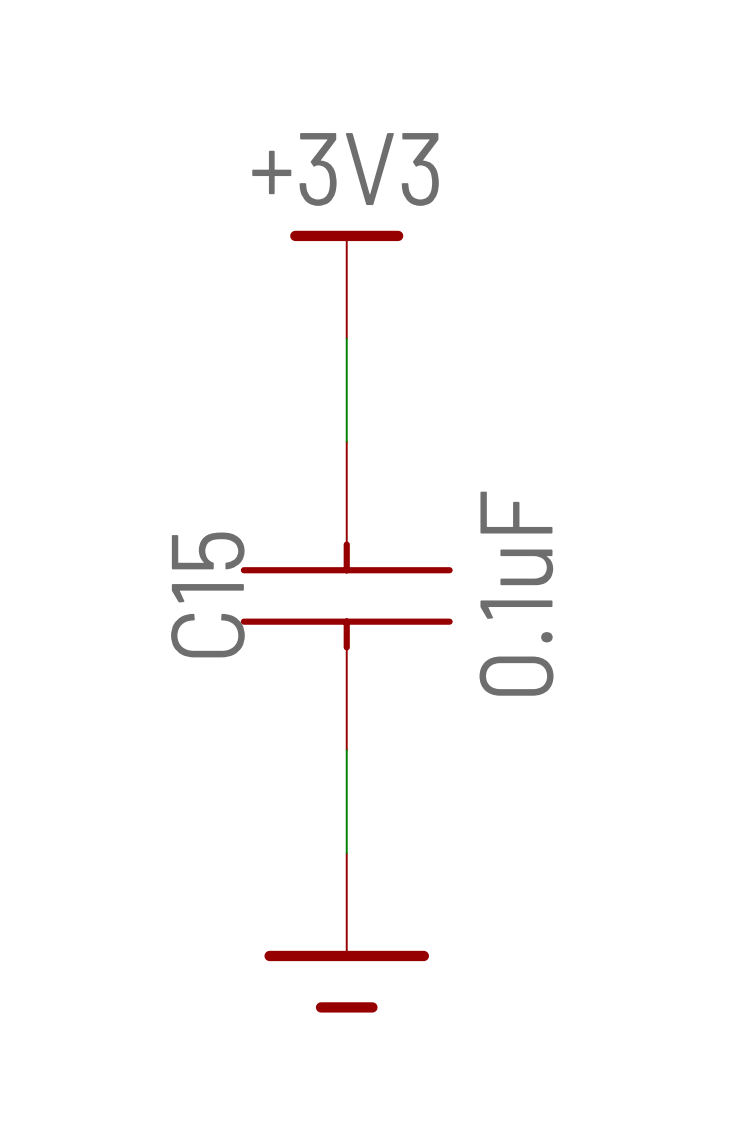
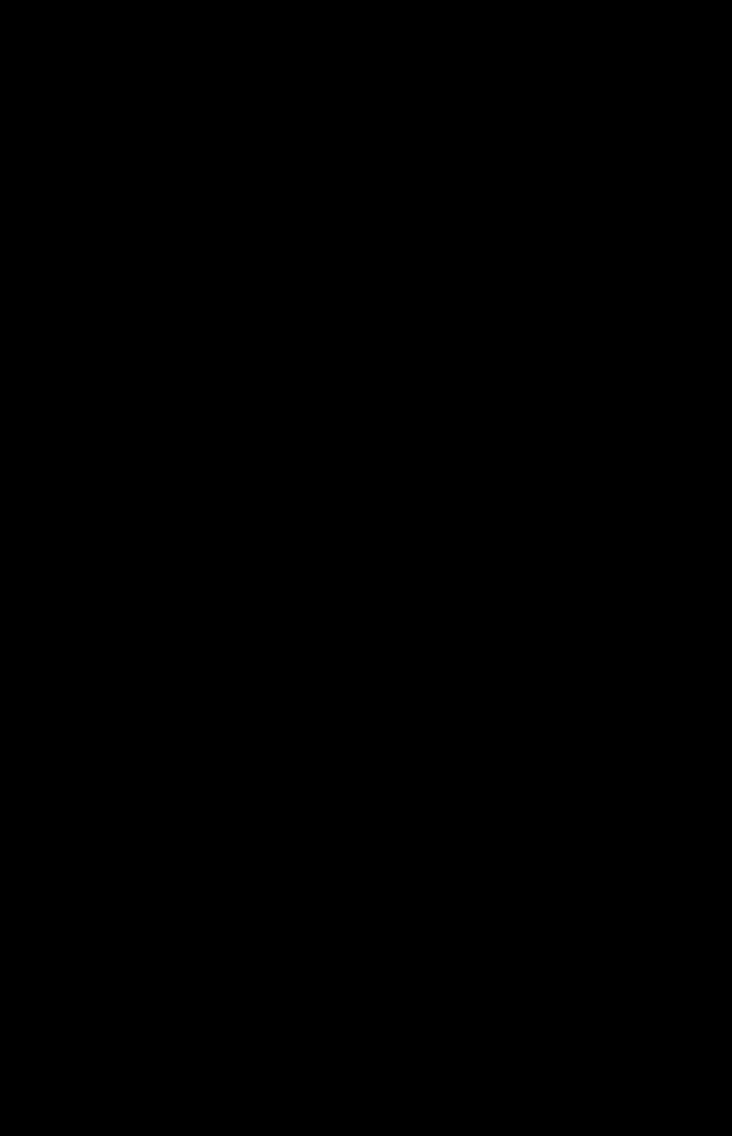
power symbol: +3V3 (346, 284) -> none
wire: (346, 338) (346, 441) -> none
C15: 0.1uF (346, 595) -> none
wire: (346, 750) (346, 853) -> none
power symbol: (346, 932) -> none

